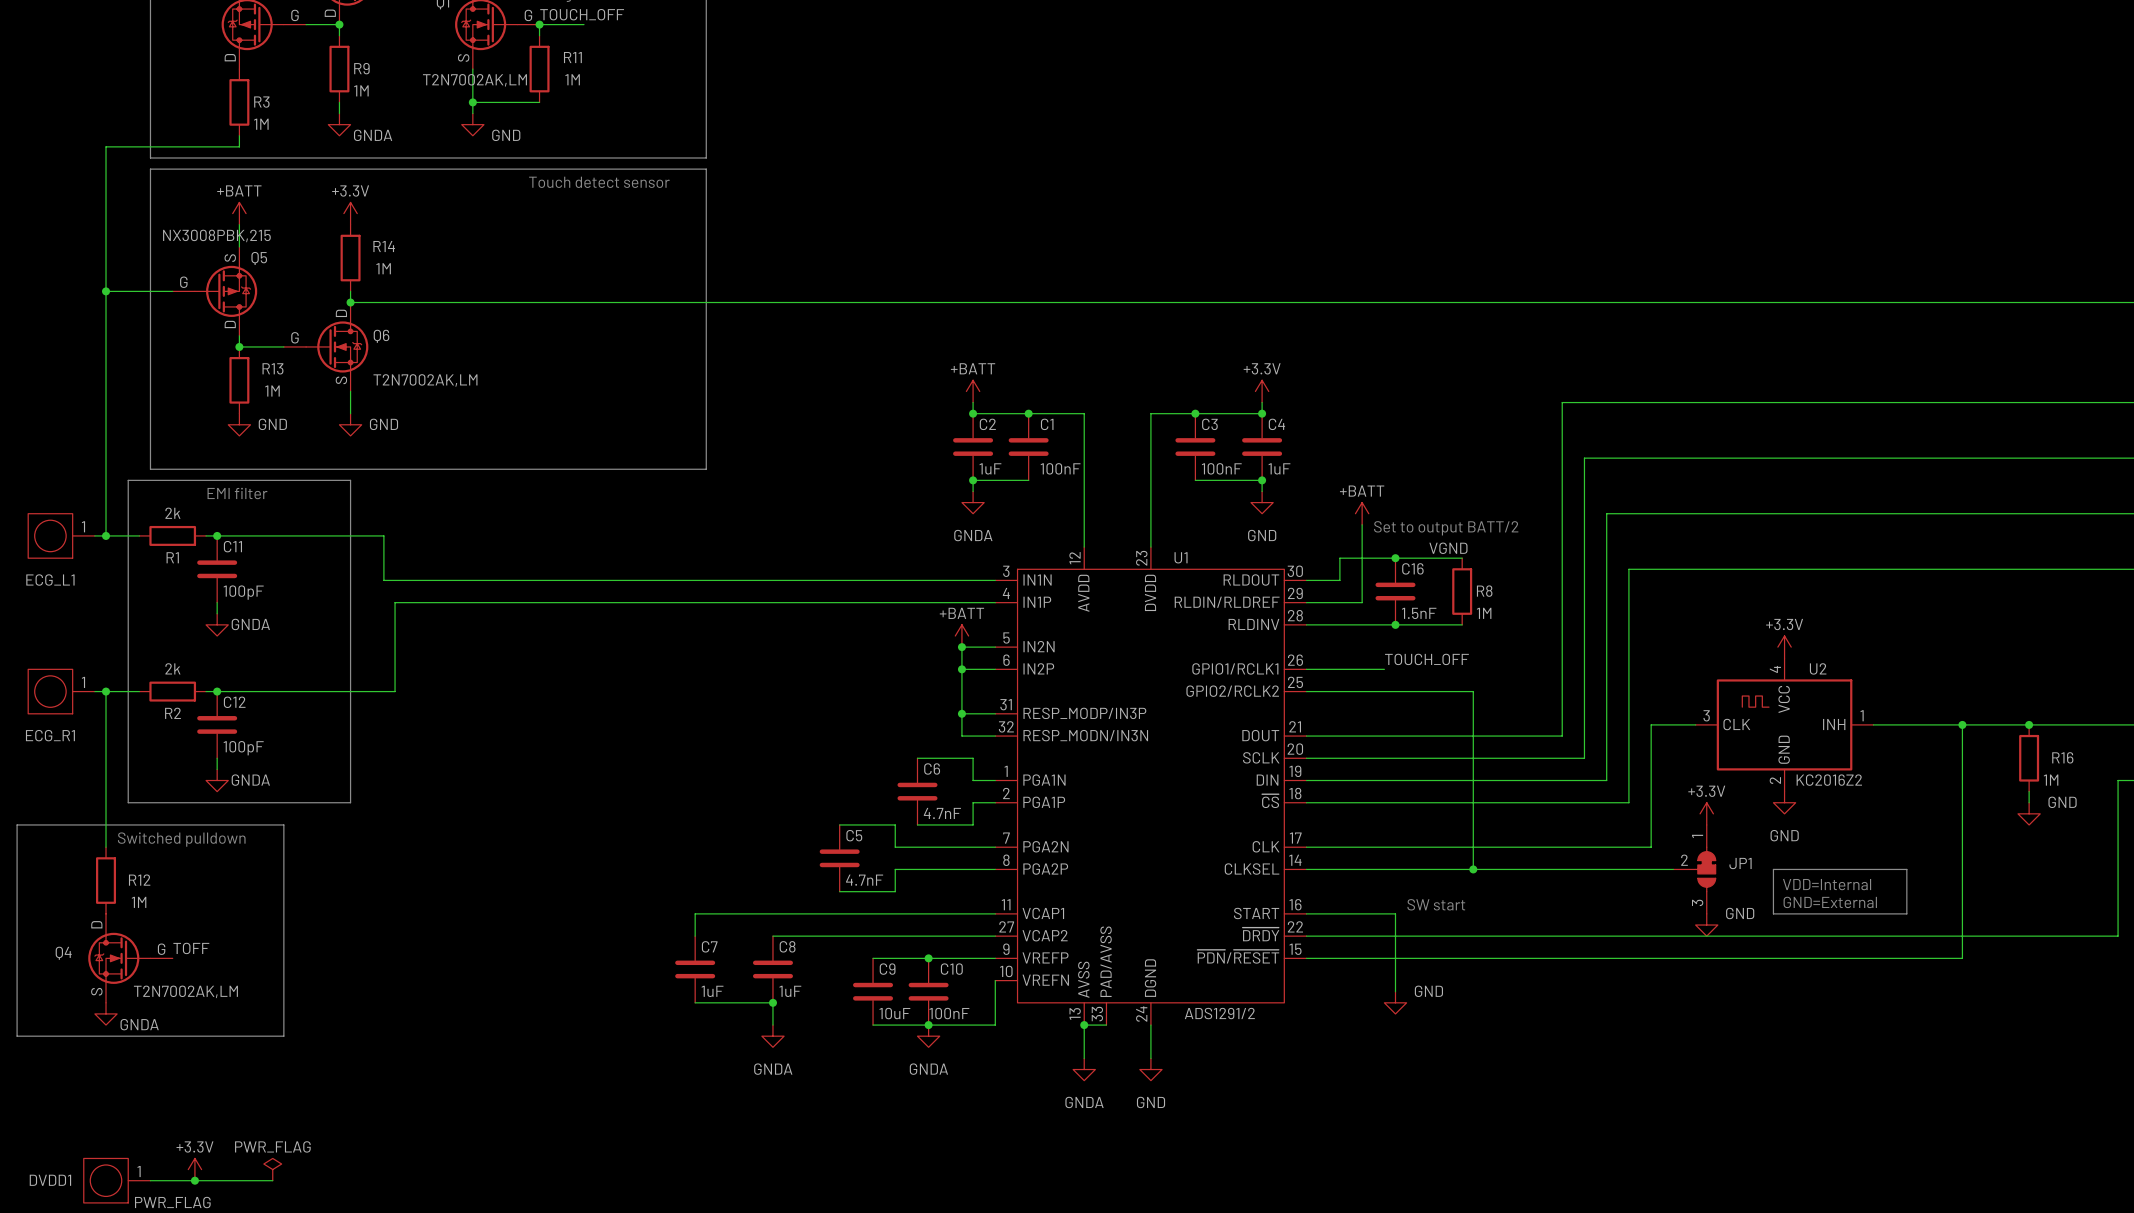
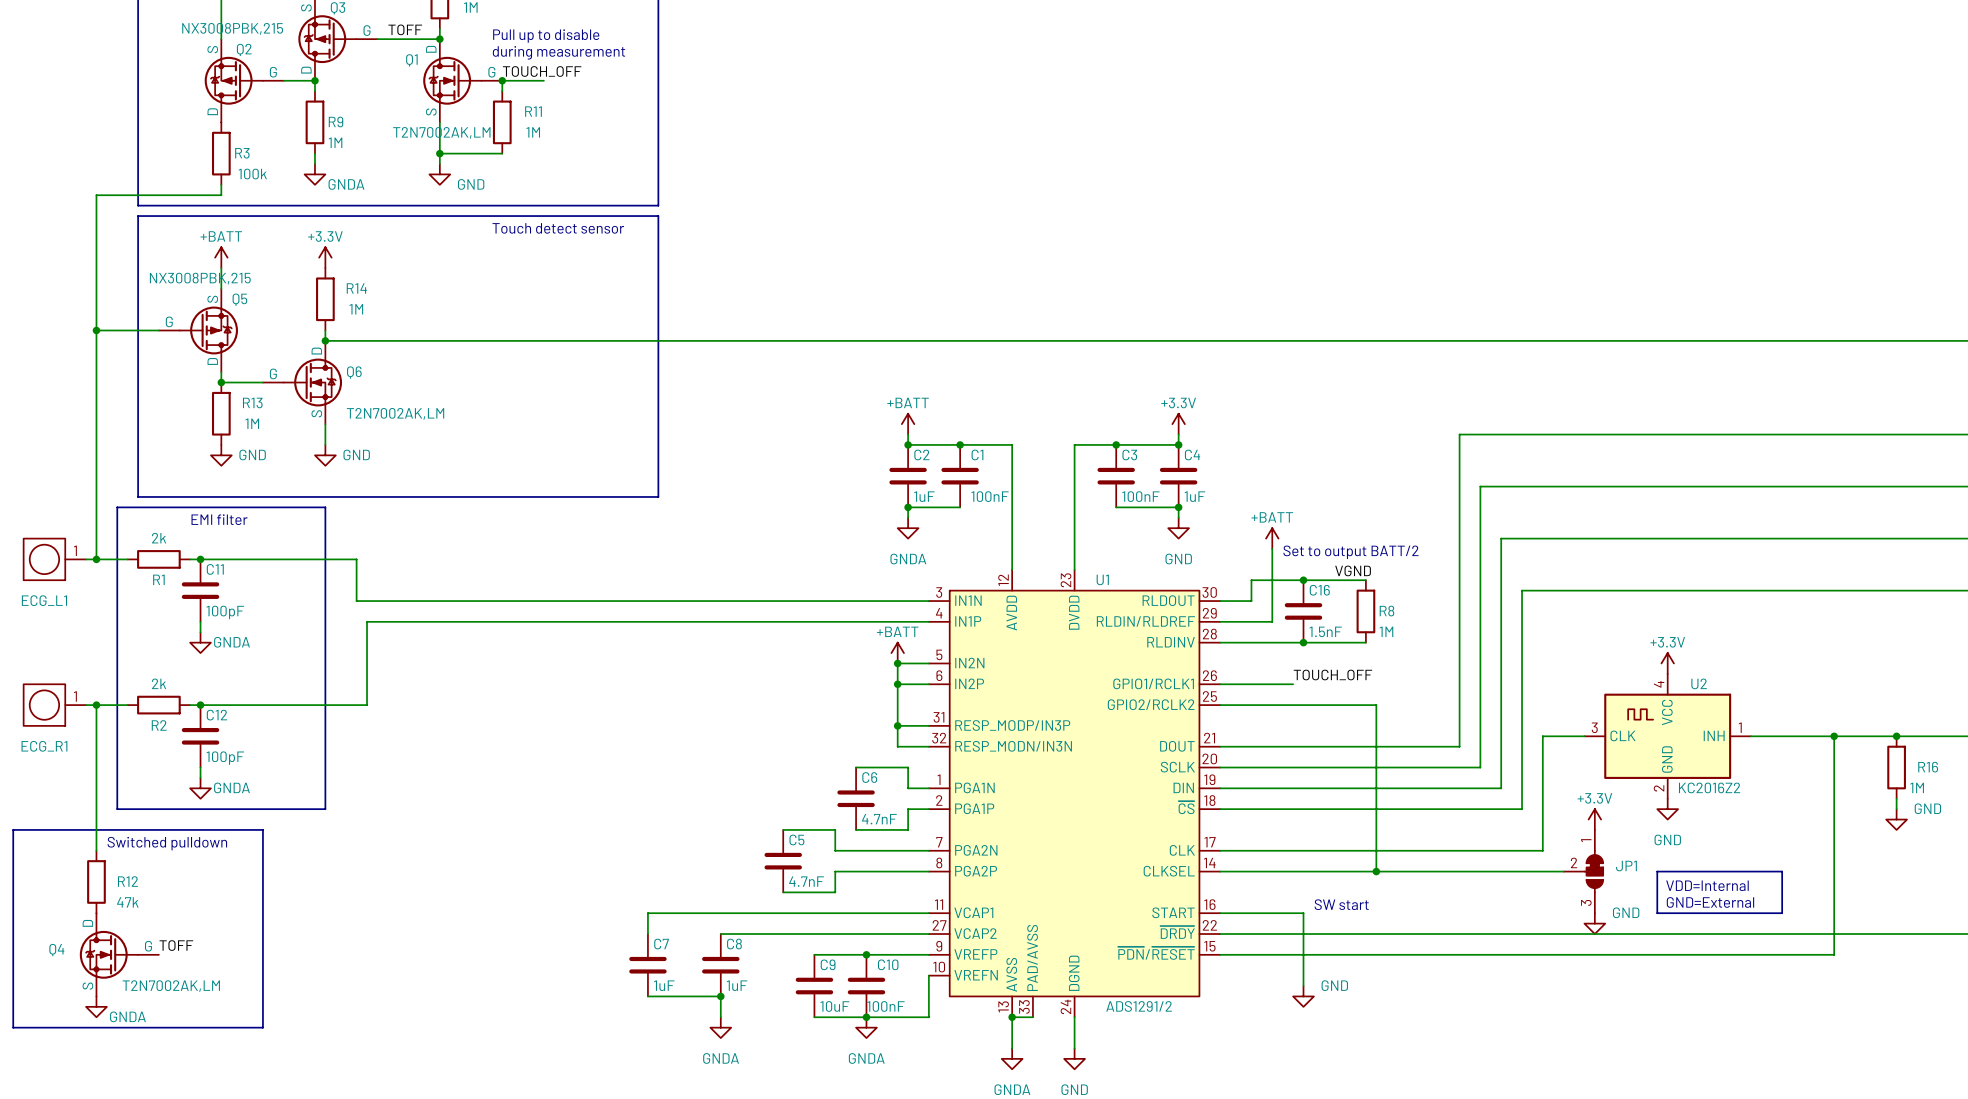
R3 value: 1M (261, 124) -> 100k (252, 174)
R12 value: 1M (139, 902) -> 47k (127, 902)

